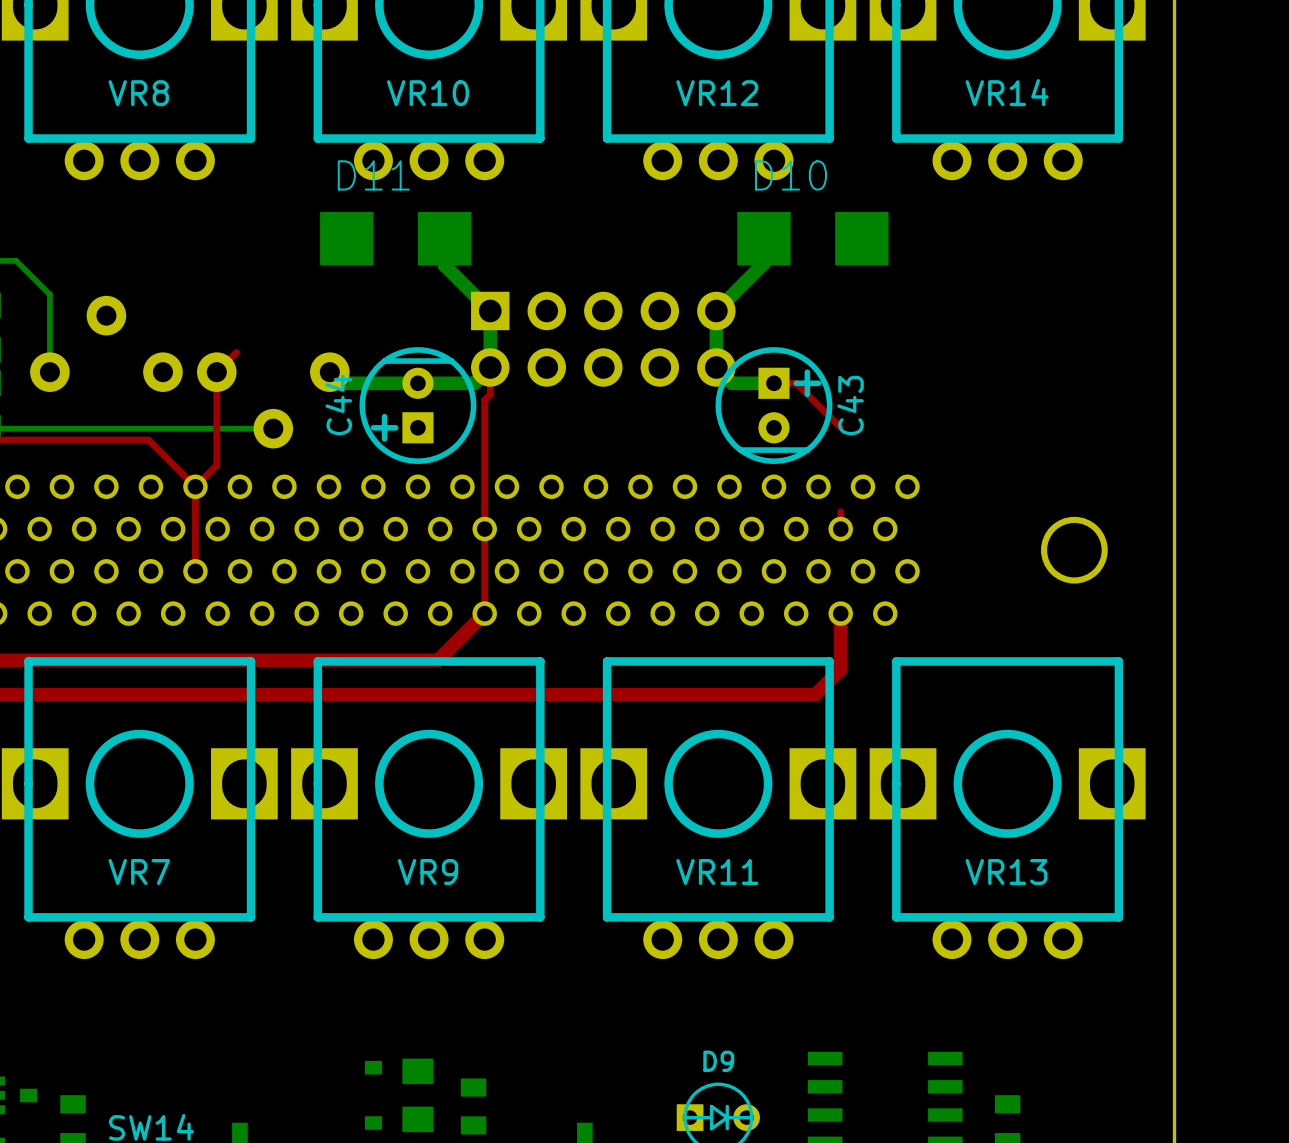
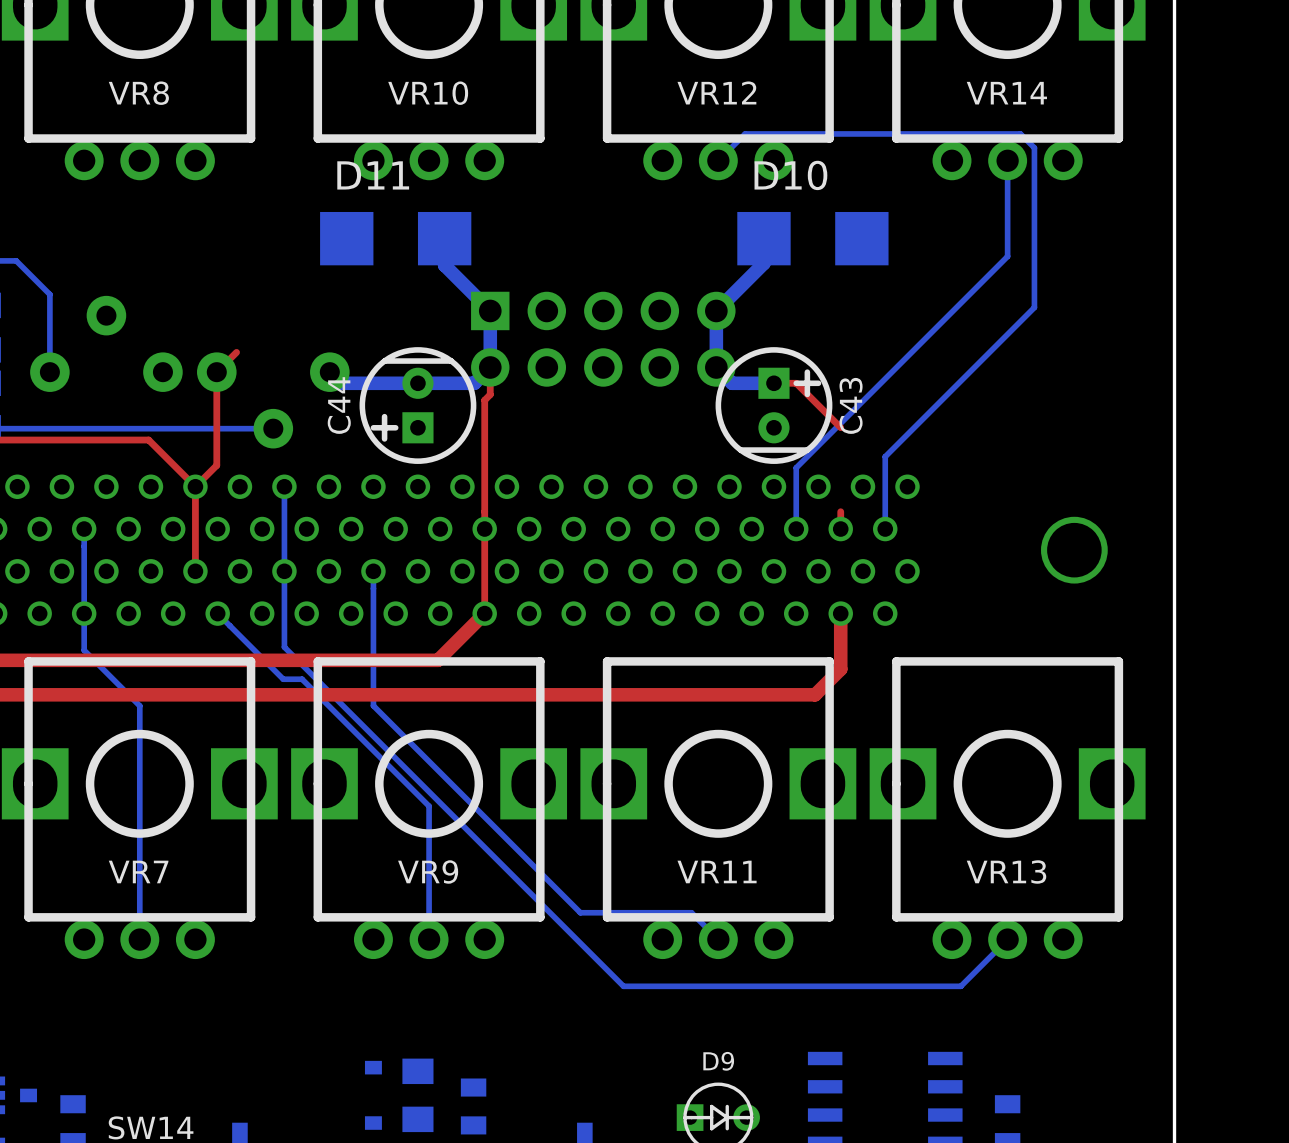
bottom track: none -> (718, 160) (745, 133) (1020, 133) (1034, 147) (1034, 307) (885, 456) (885, 529)
bottom track: none -> (1007, 160) (1007, 256) (796, 467) (796, 529)
bottom track: none -> (284, 486) (284, 647) (623, 986) (960, 986) (1007, 939)
bottom track: none -> (84, 529) (84, 650) (139, 705) (139, 939)
bottom track: none -> (373, 571) (373, 705) (580, 912) (691, 912) (718, 939)
bottom track: none -> (217, 613) (283, 679) (302, 679) (429, 806) (429, 939)

